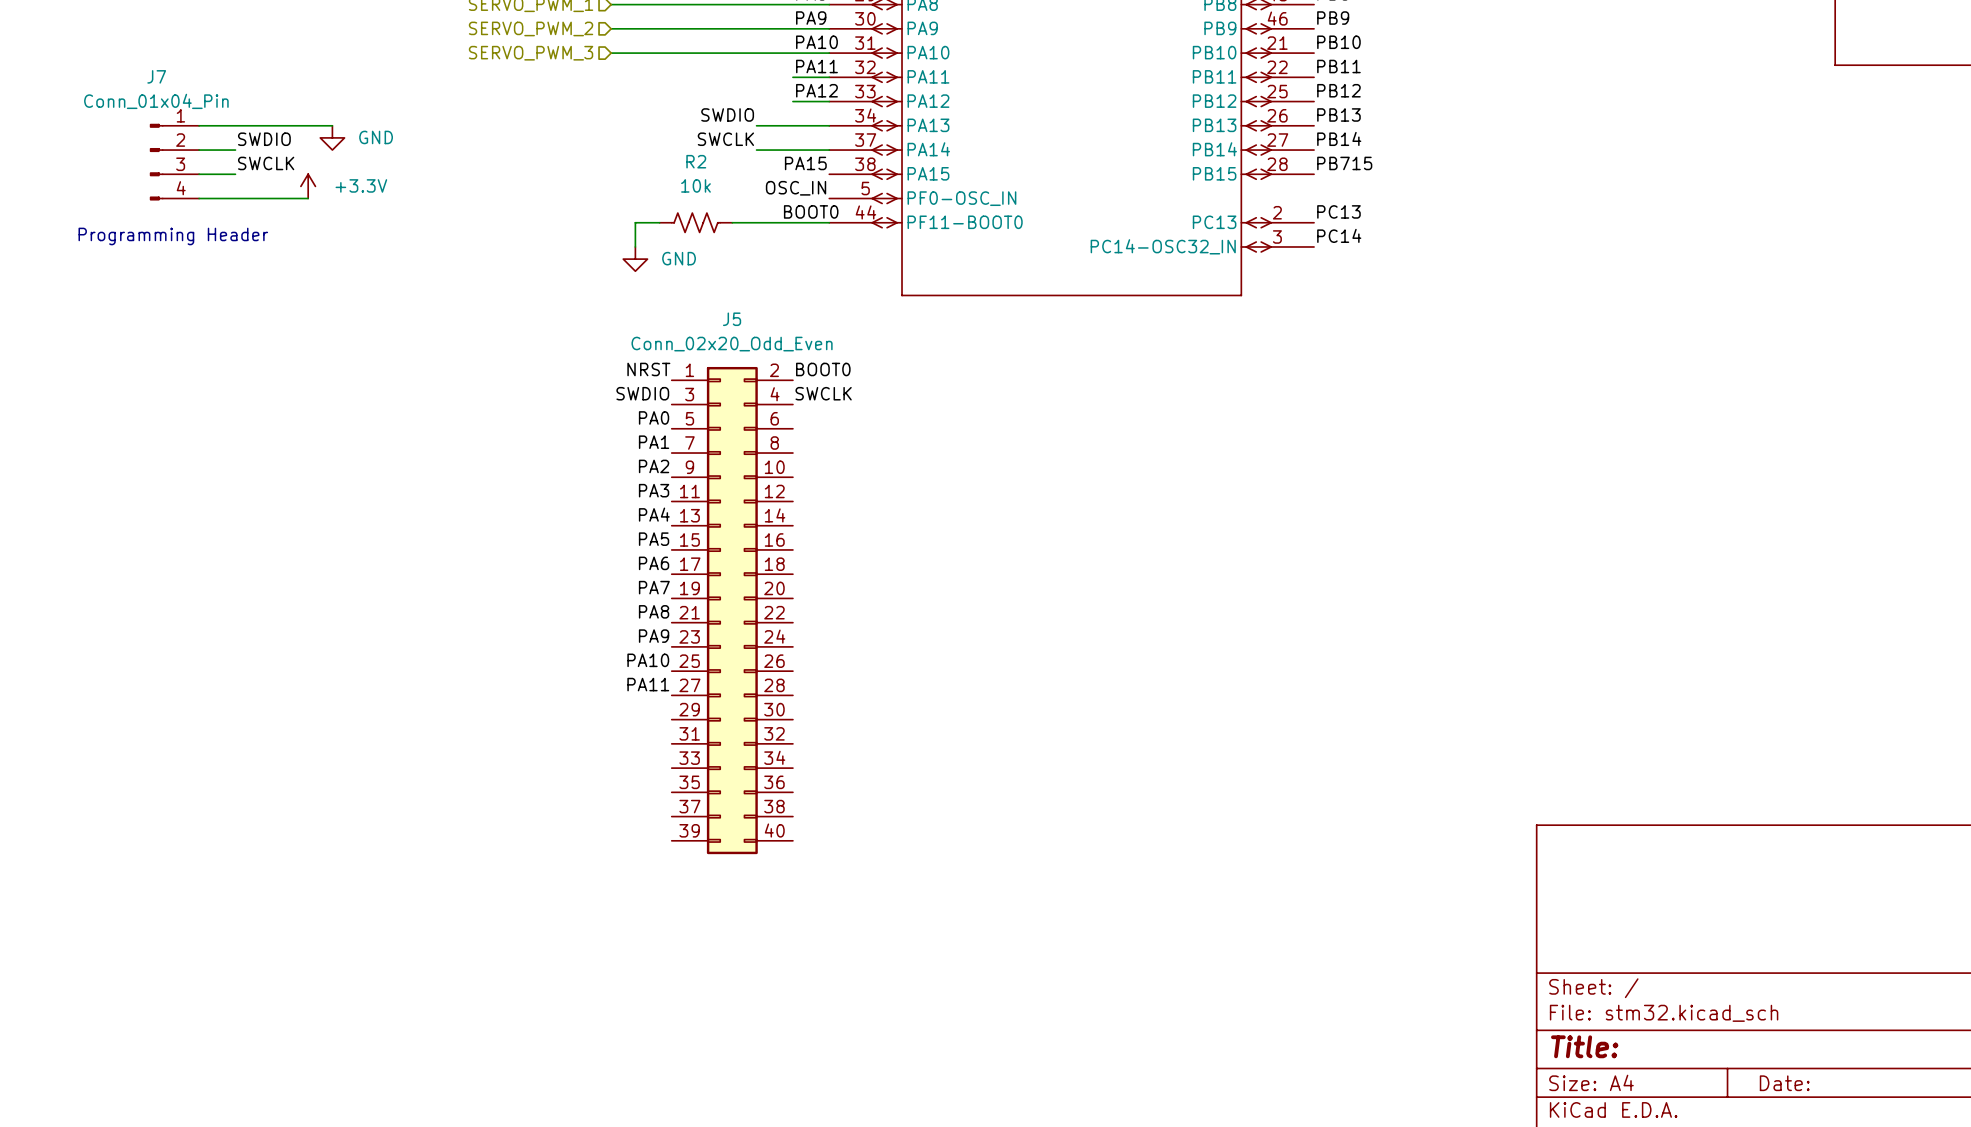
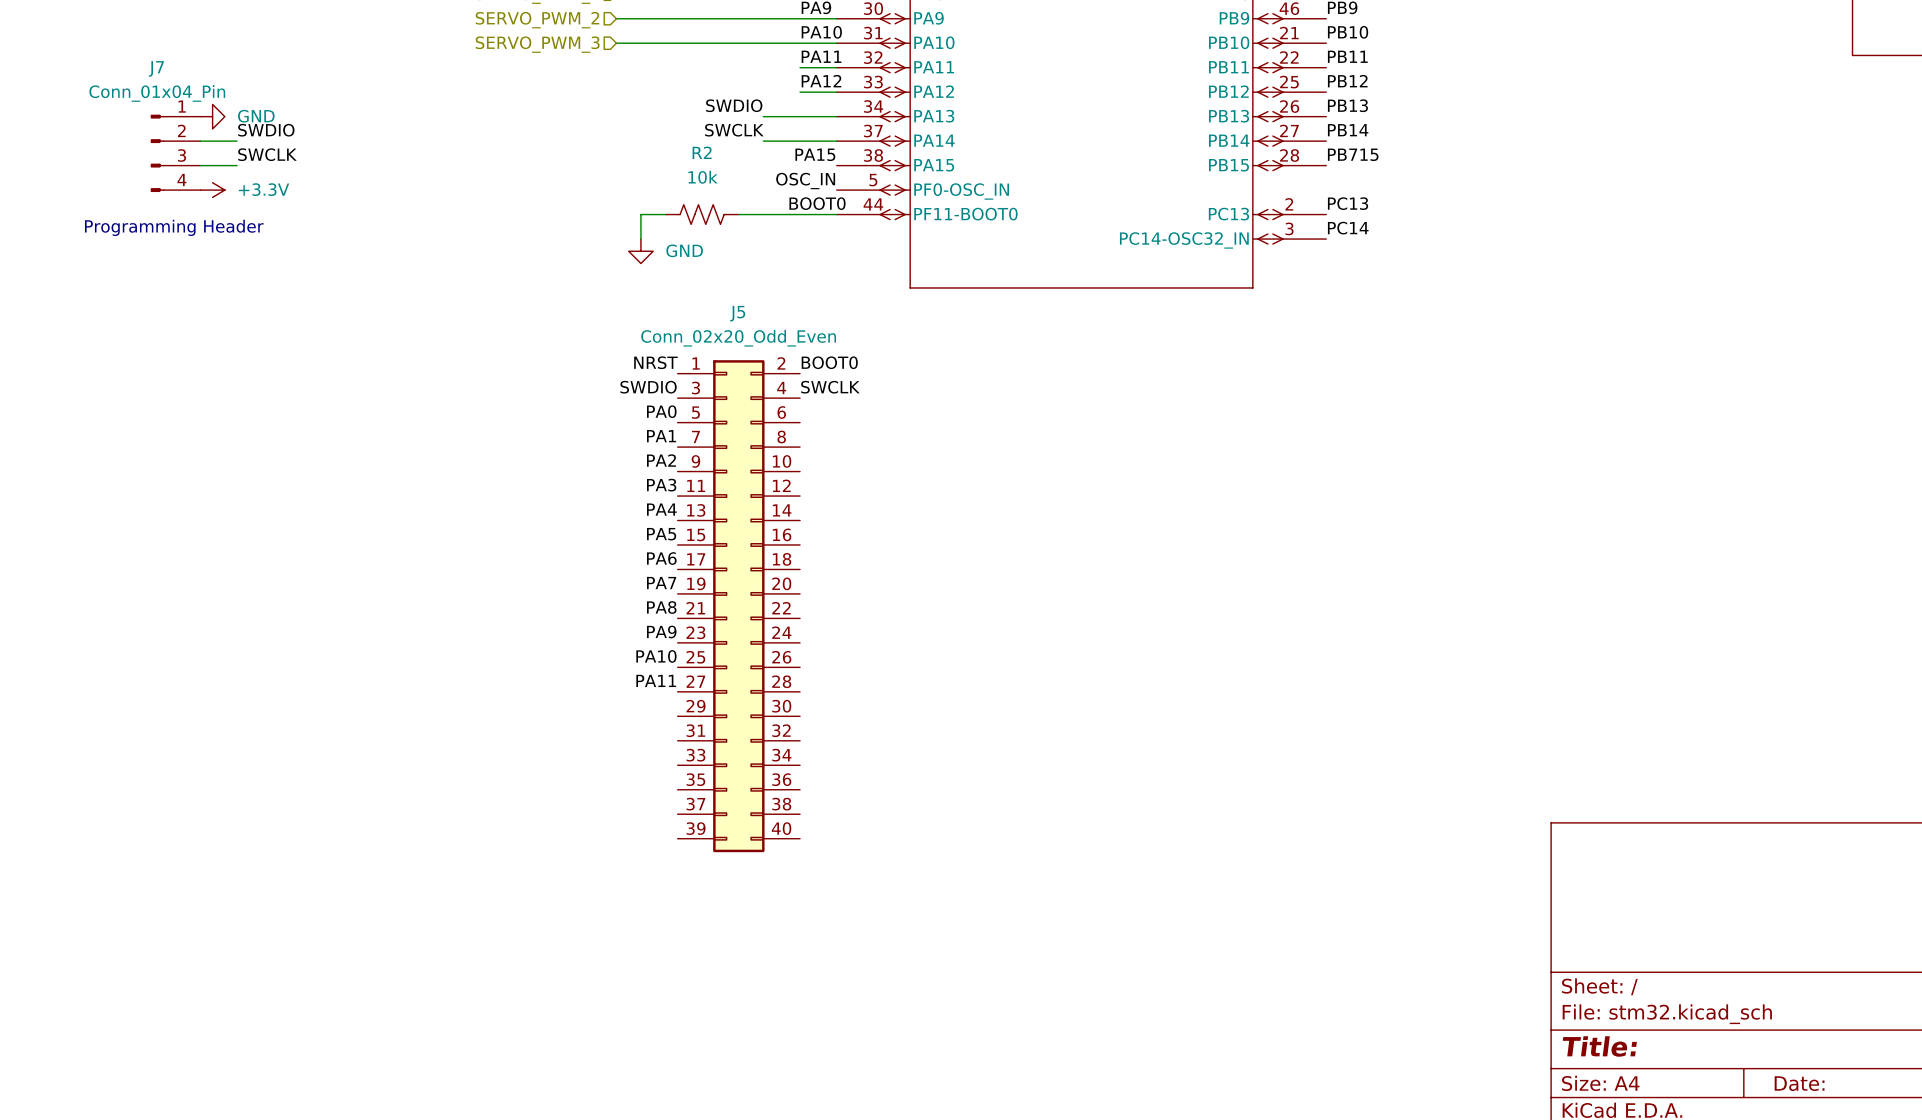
wire: (199, 125) (332, 125) -> none
power symbol rotation: 0° (332, 137) -> 90° counterclockwise (212, 116)
power symbol position: GND (332, 137) -> GND (212, 116)
power symbol rotation: 0° (308, 186) -> 90° clockwise (212, 190)
power symbol position: +3.3V (308, 186) -> +3.3V (212, 190)
wire: (199, 198) (308, 198) -> none

